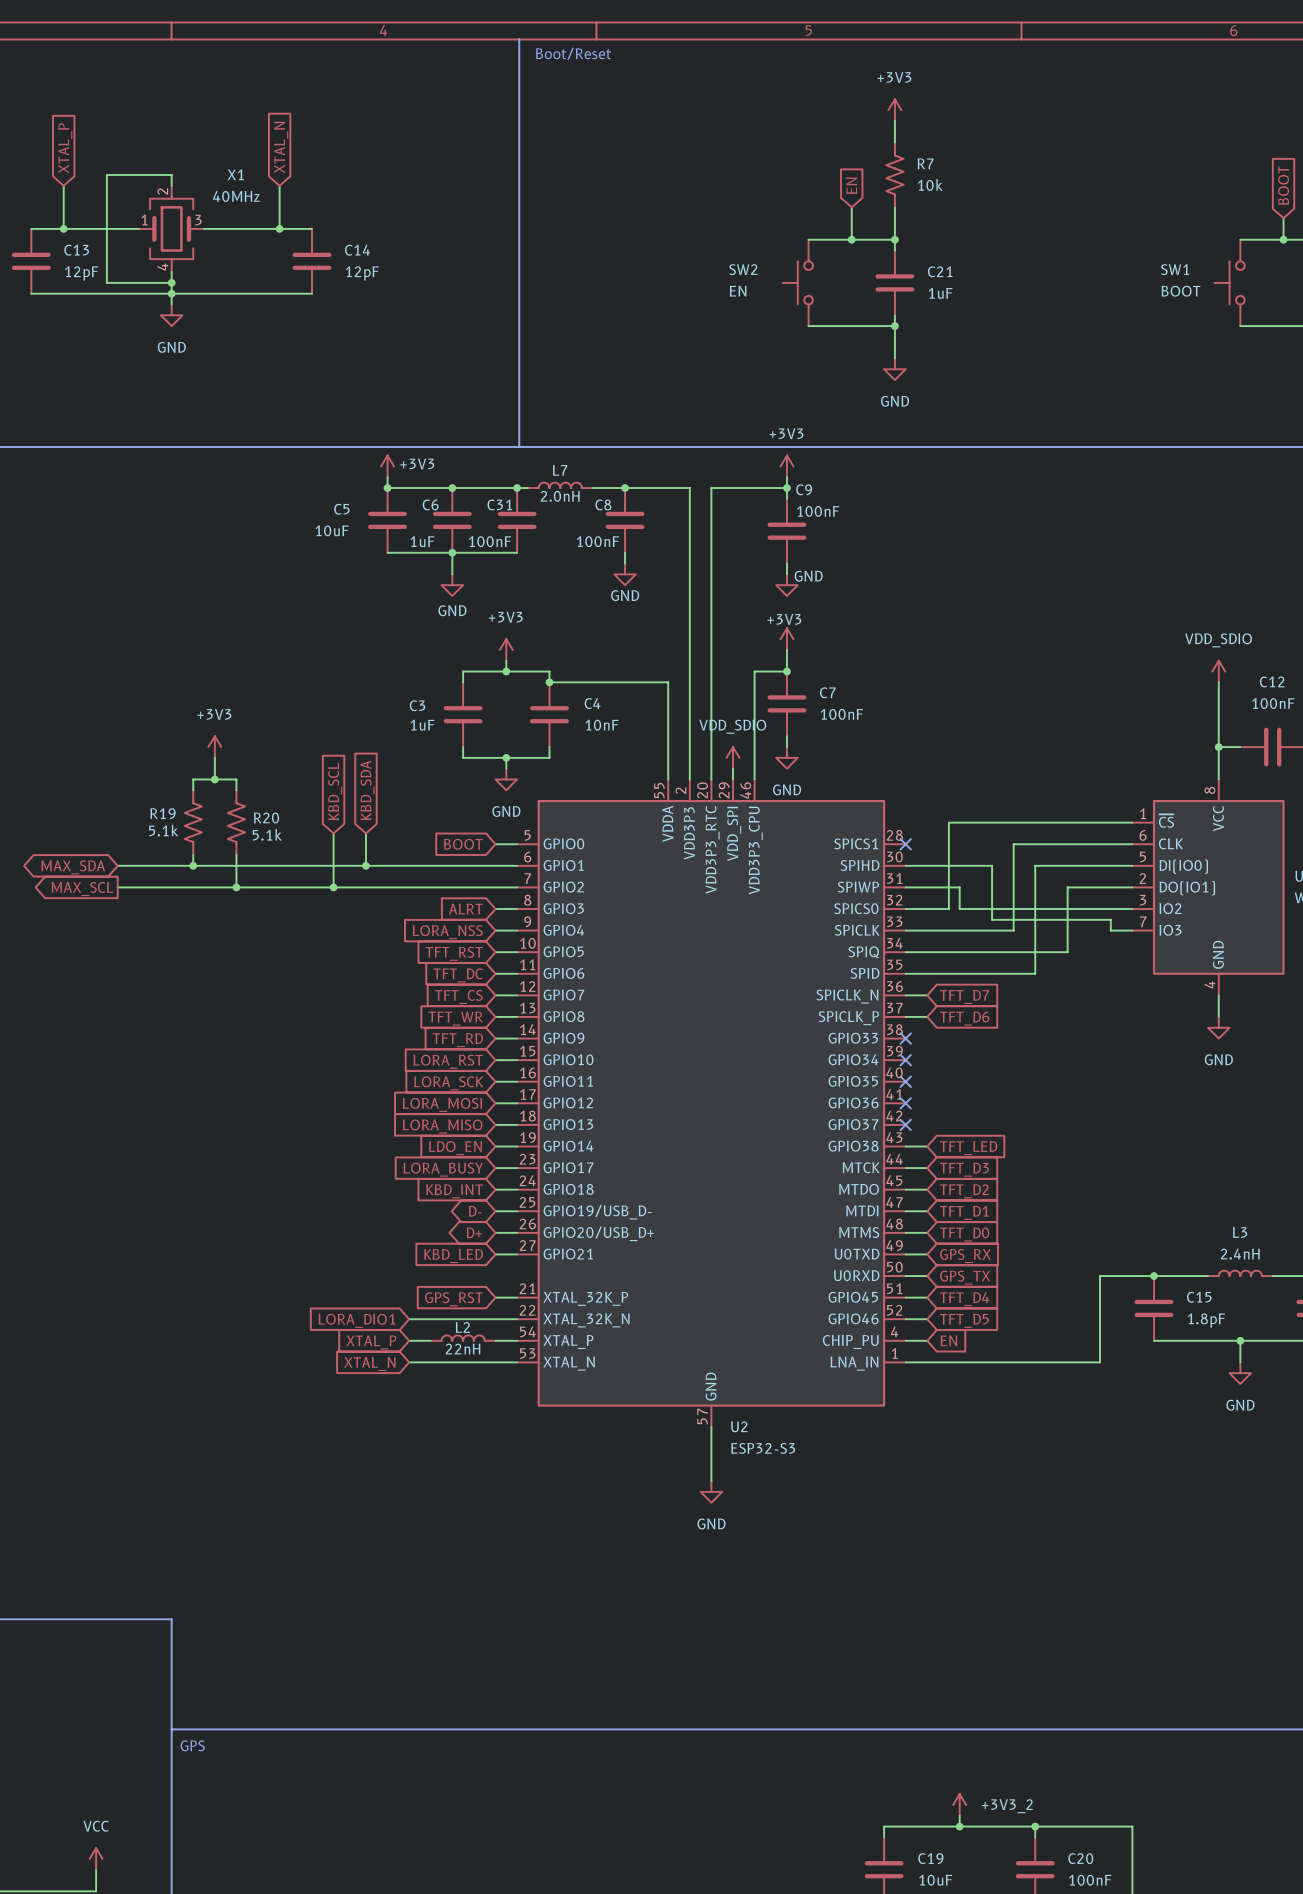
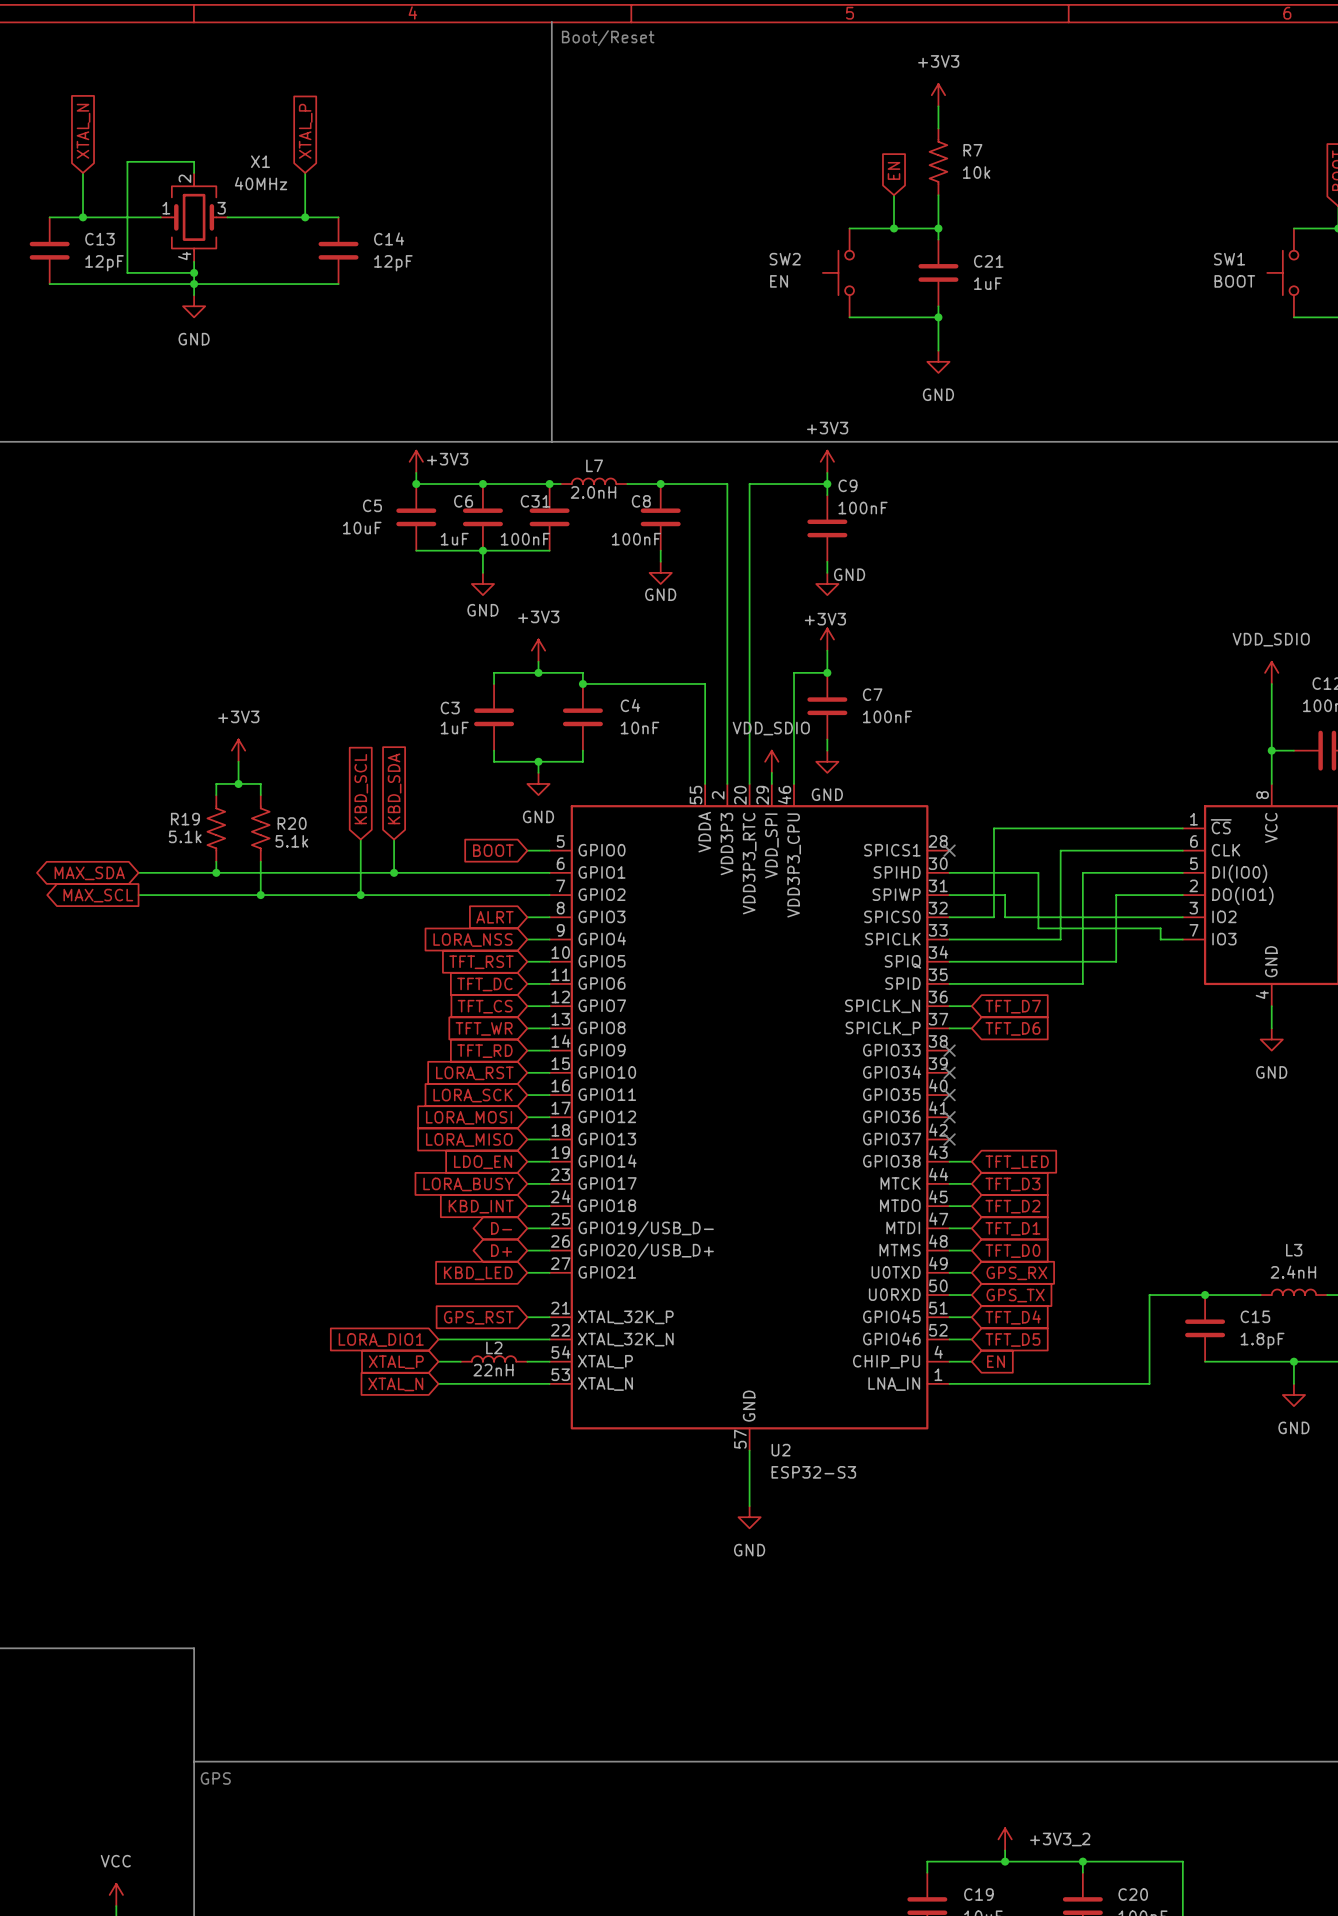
global label: XTAL_N (281, 147) -> XTAL_P (305, 131)
global label: XTAL_P (65, 148) -> XTAL_N (83, 131)

